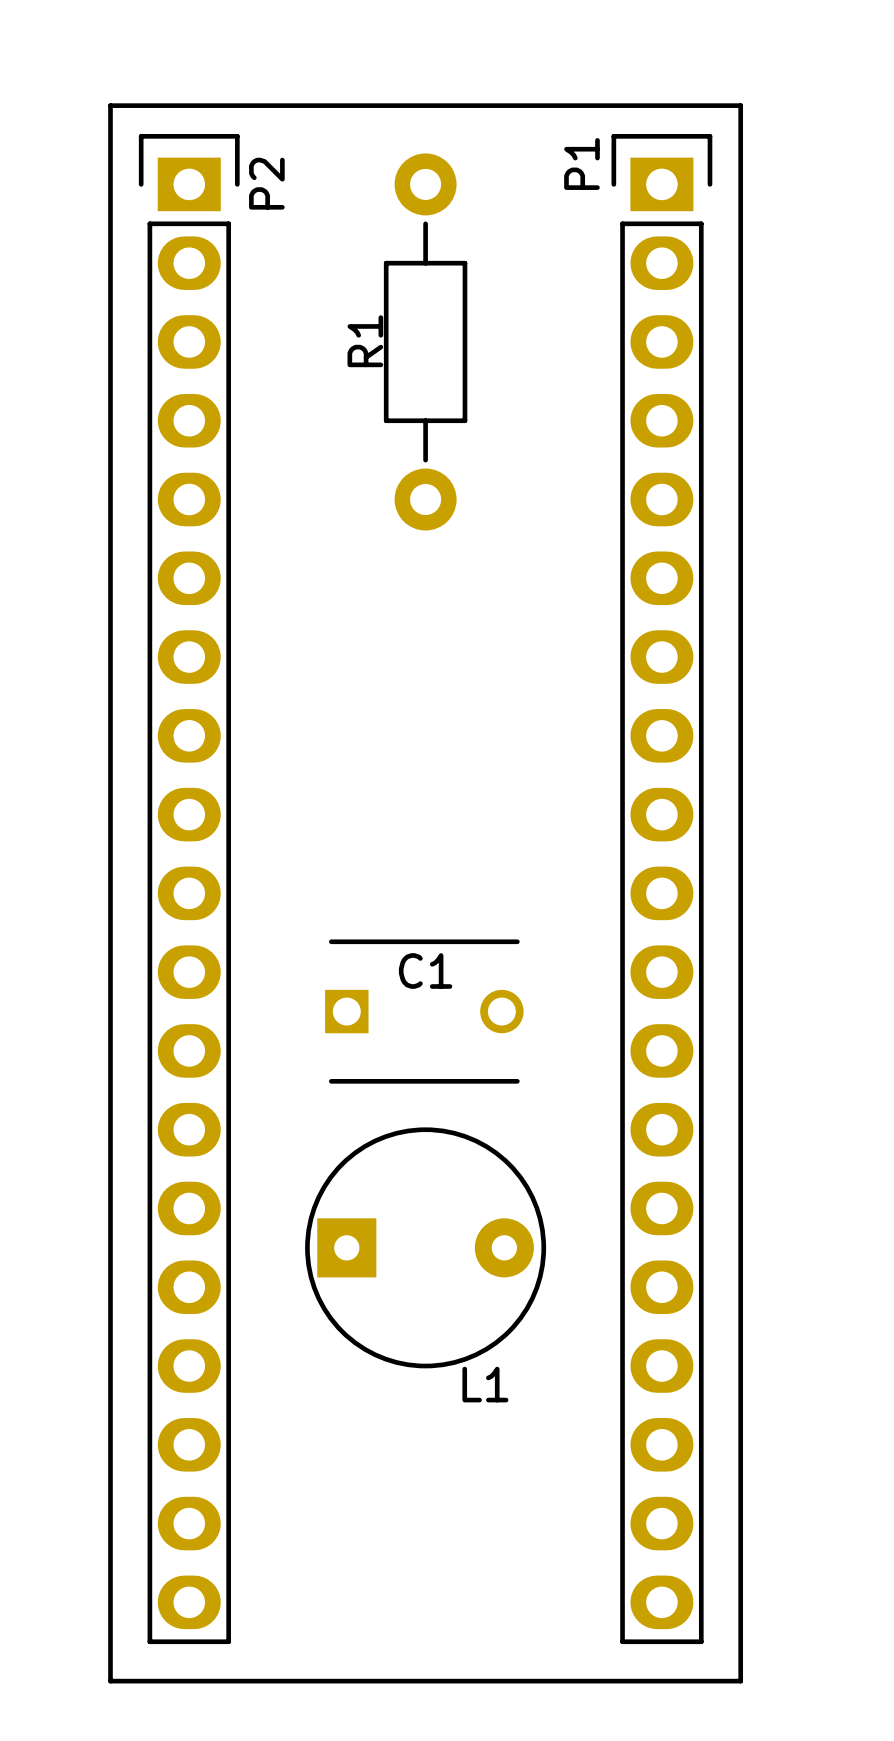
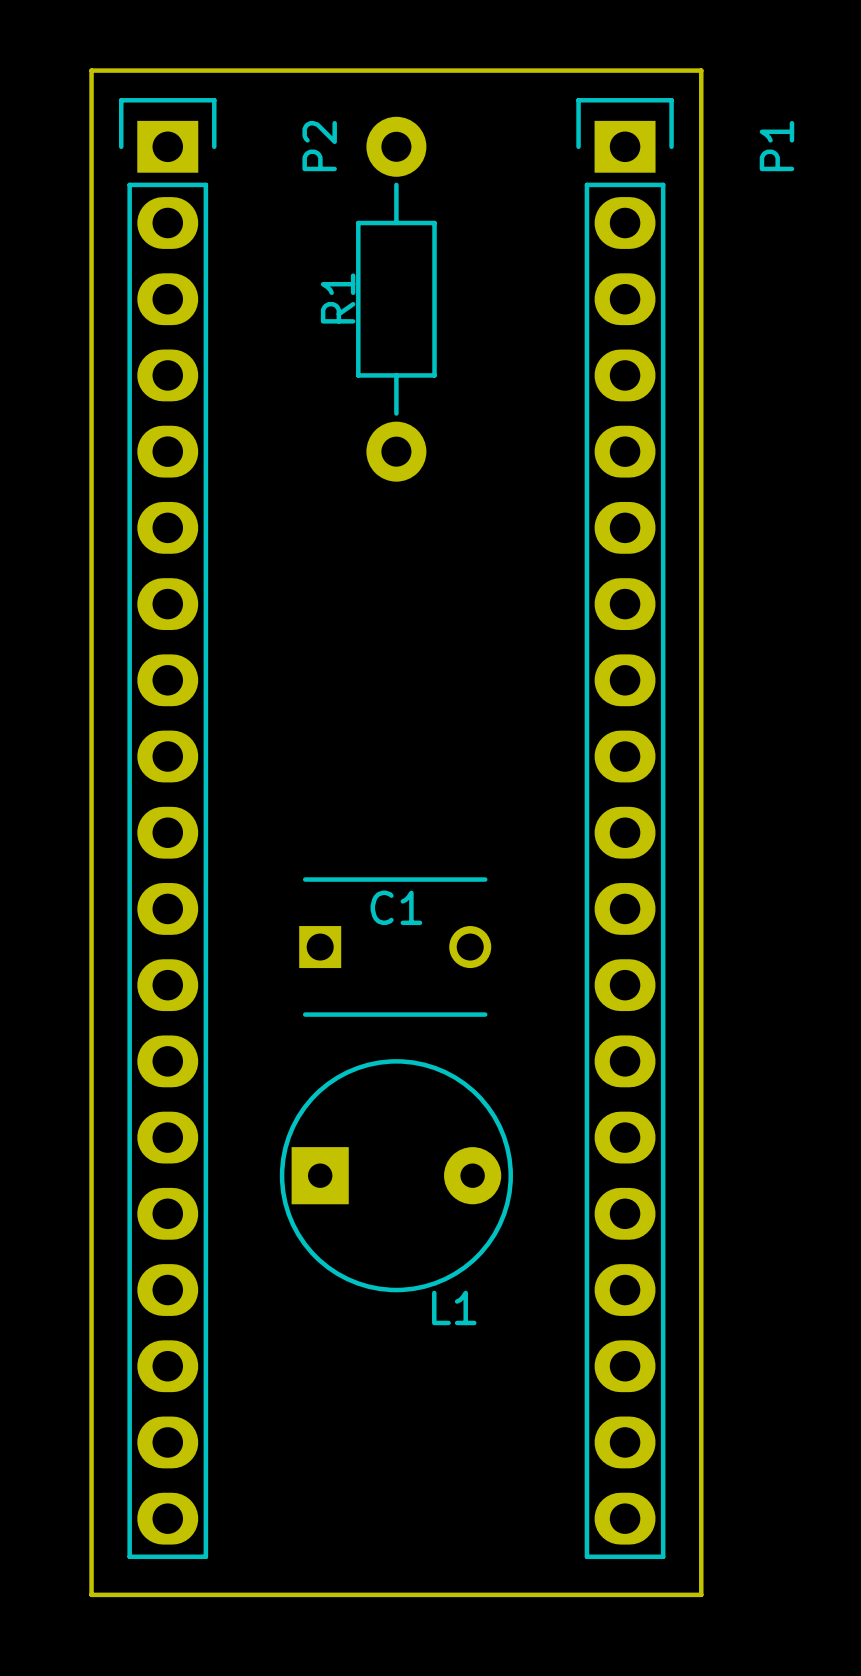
P1 name position: P1 (581, 163) -> P1 (776, 146)
P2 name position: P2 (266, 183) -> P2 (319, 146)

